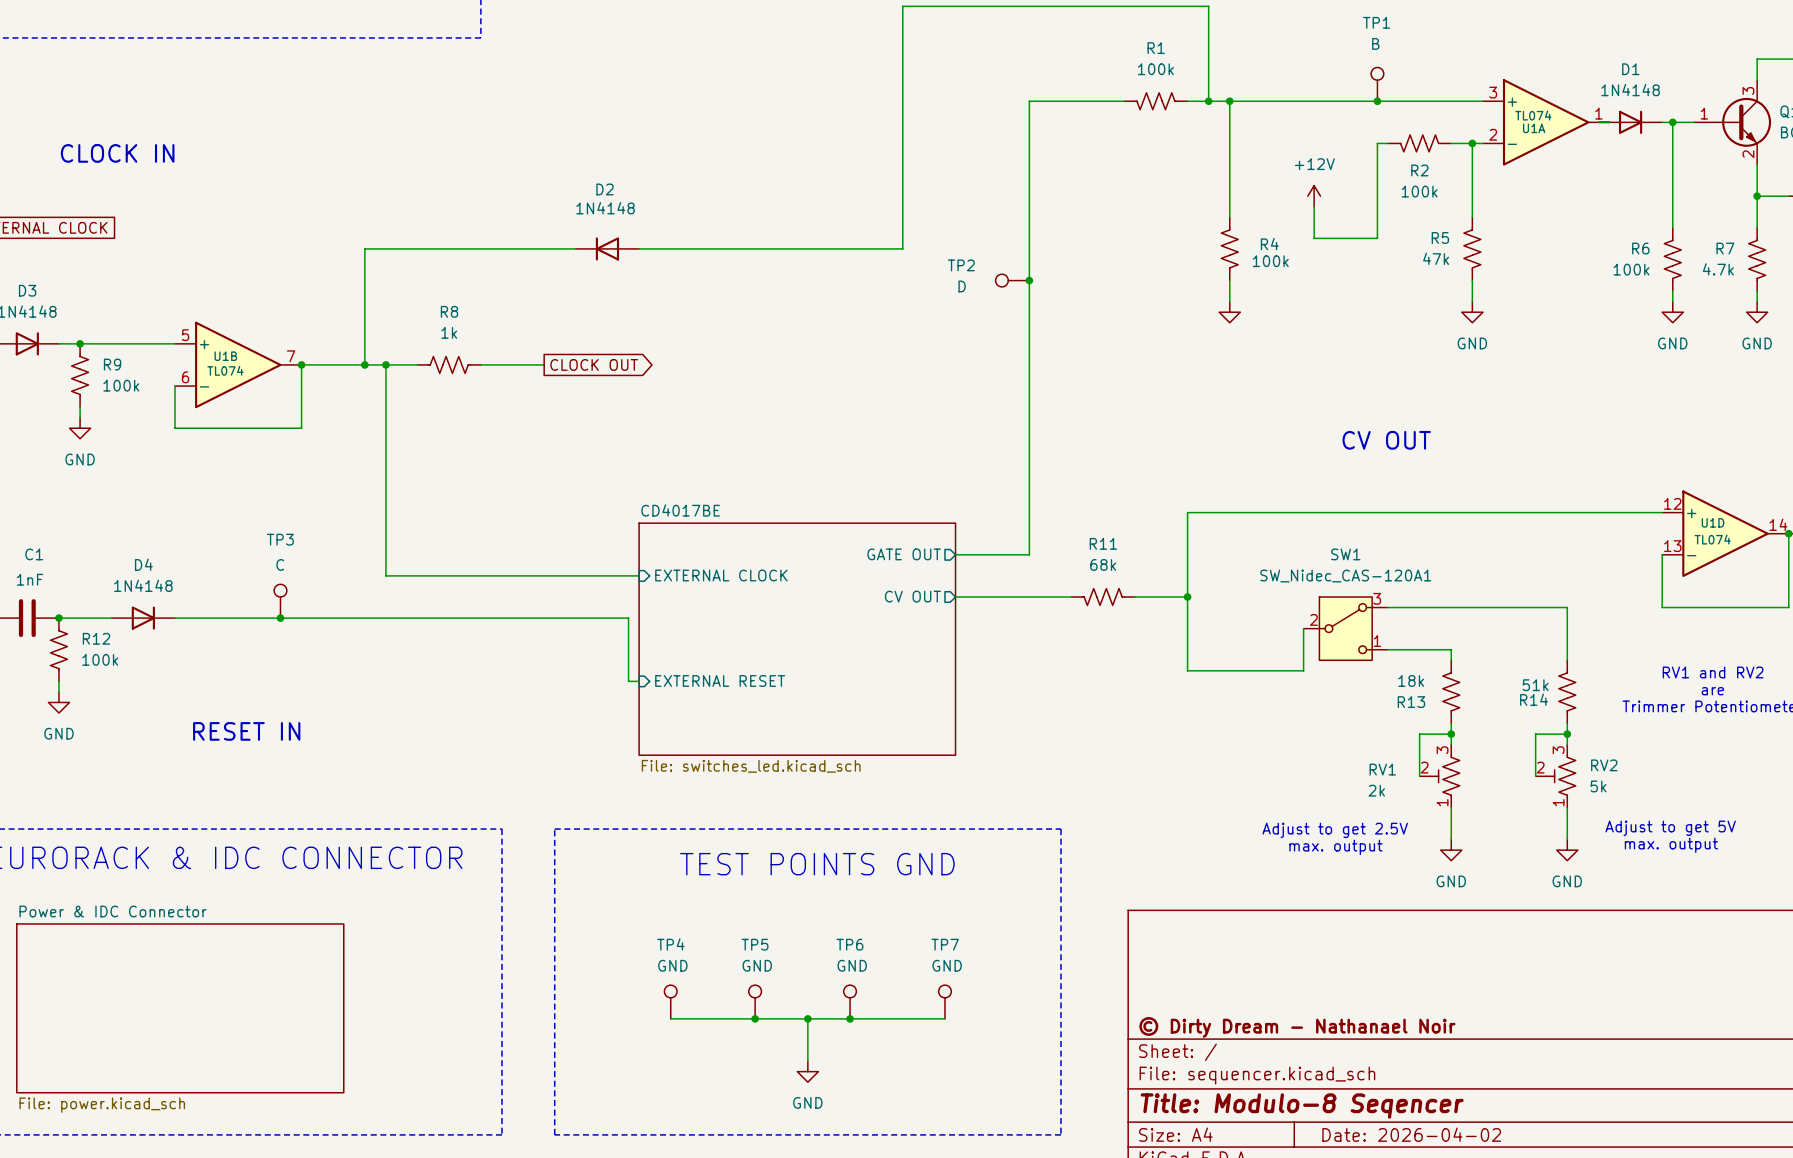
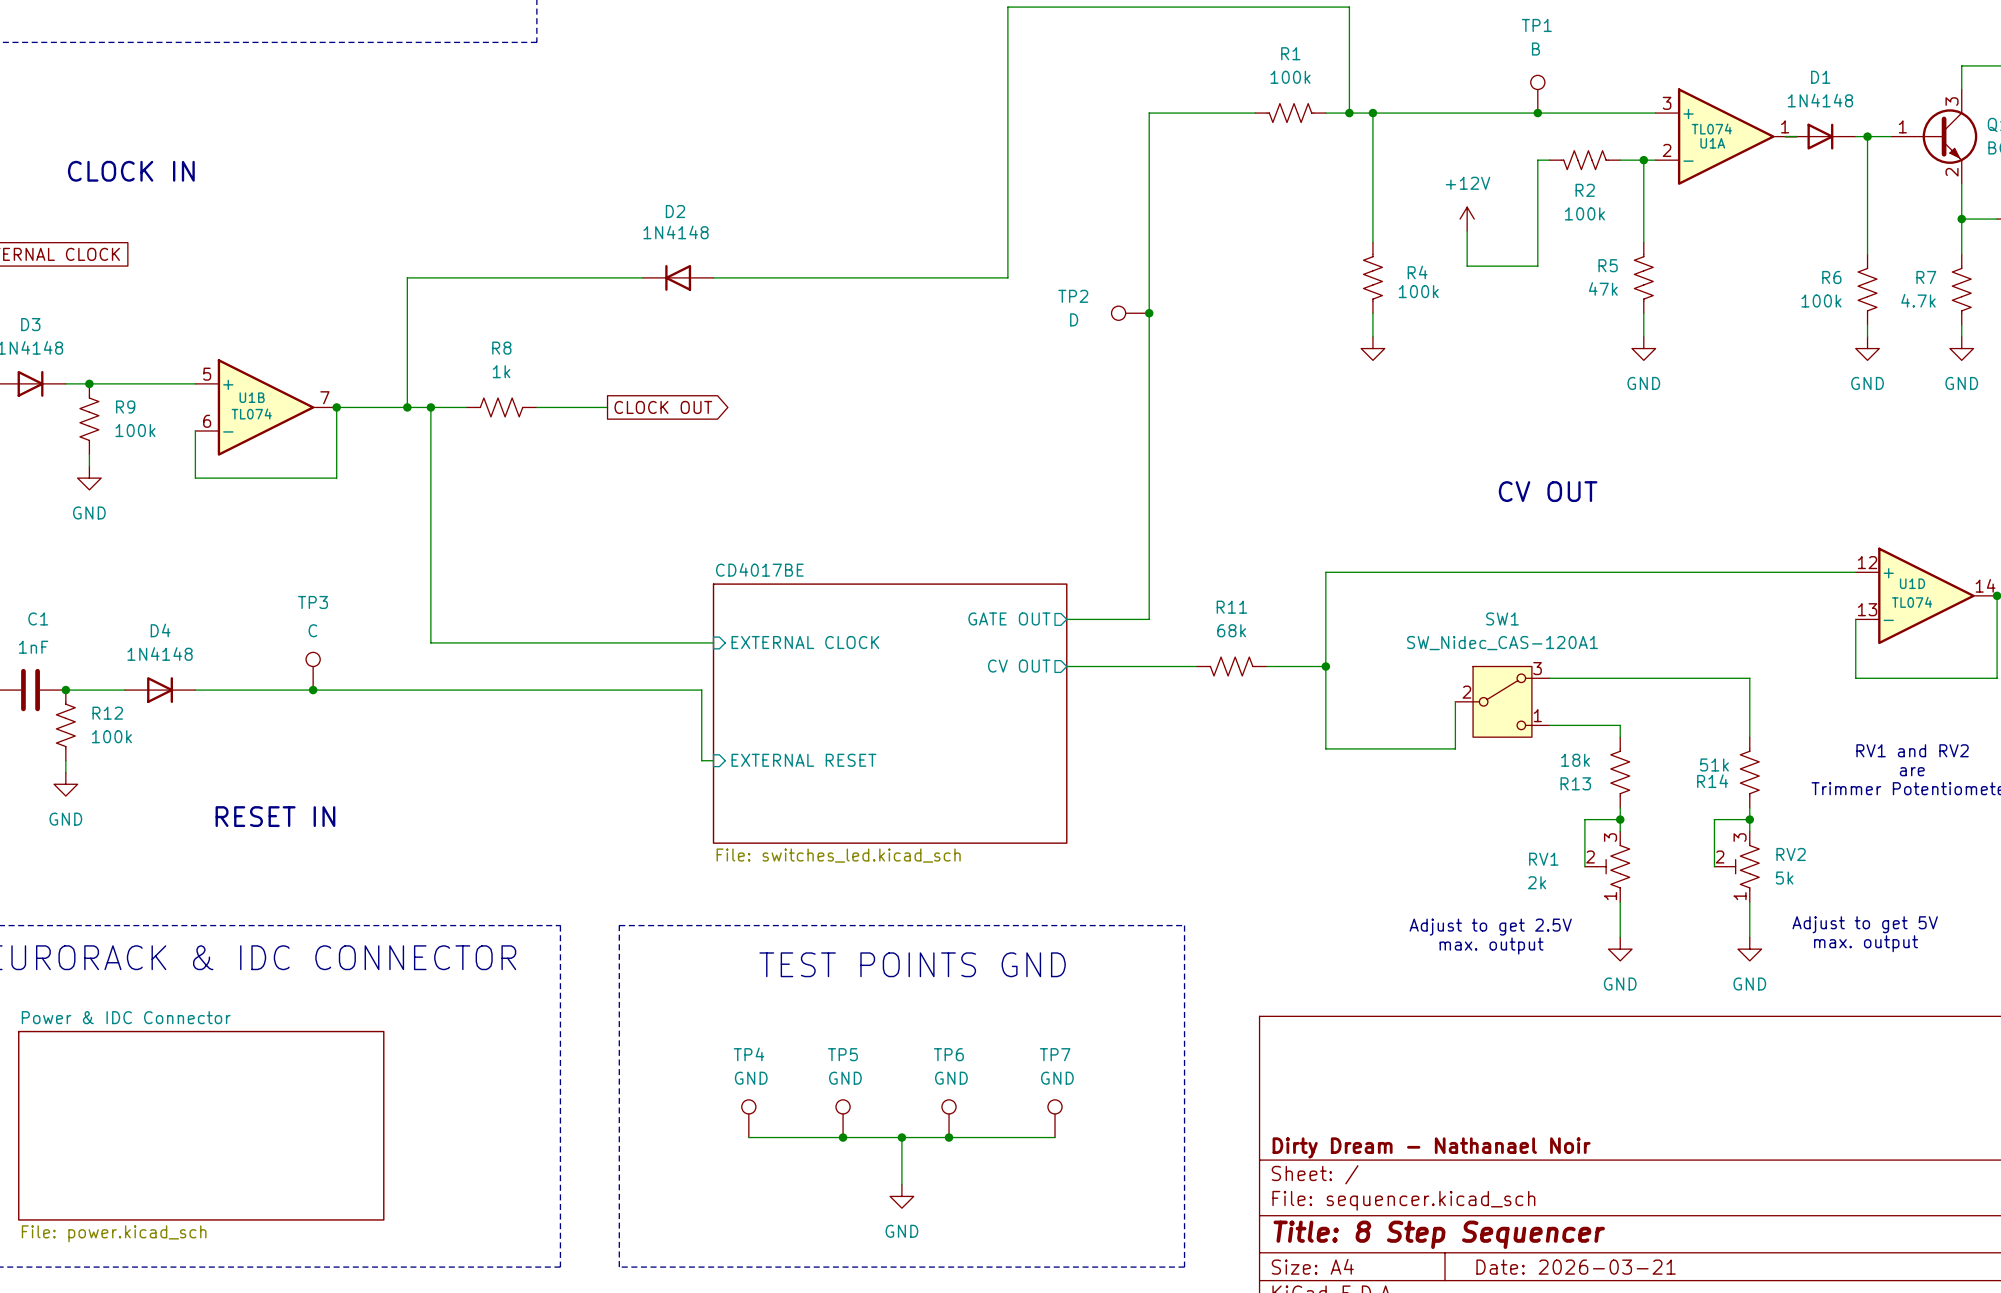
title block: © Dirty Dream - Nathanael Noir (1297, 1027) -> Dirty Dream - Nathanael Noir (1431, 1147)
title block: Title: Modulo-8 Seqencer (1302, 1106) -> Title: 8 Step Sequencer (1439, 1234)
title block: Date: 2026-04-02 (1411, 1134) -> Date: 2026-03-21 (1576, 1267)

